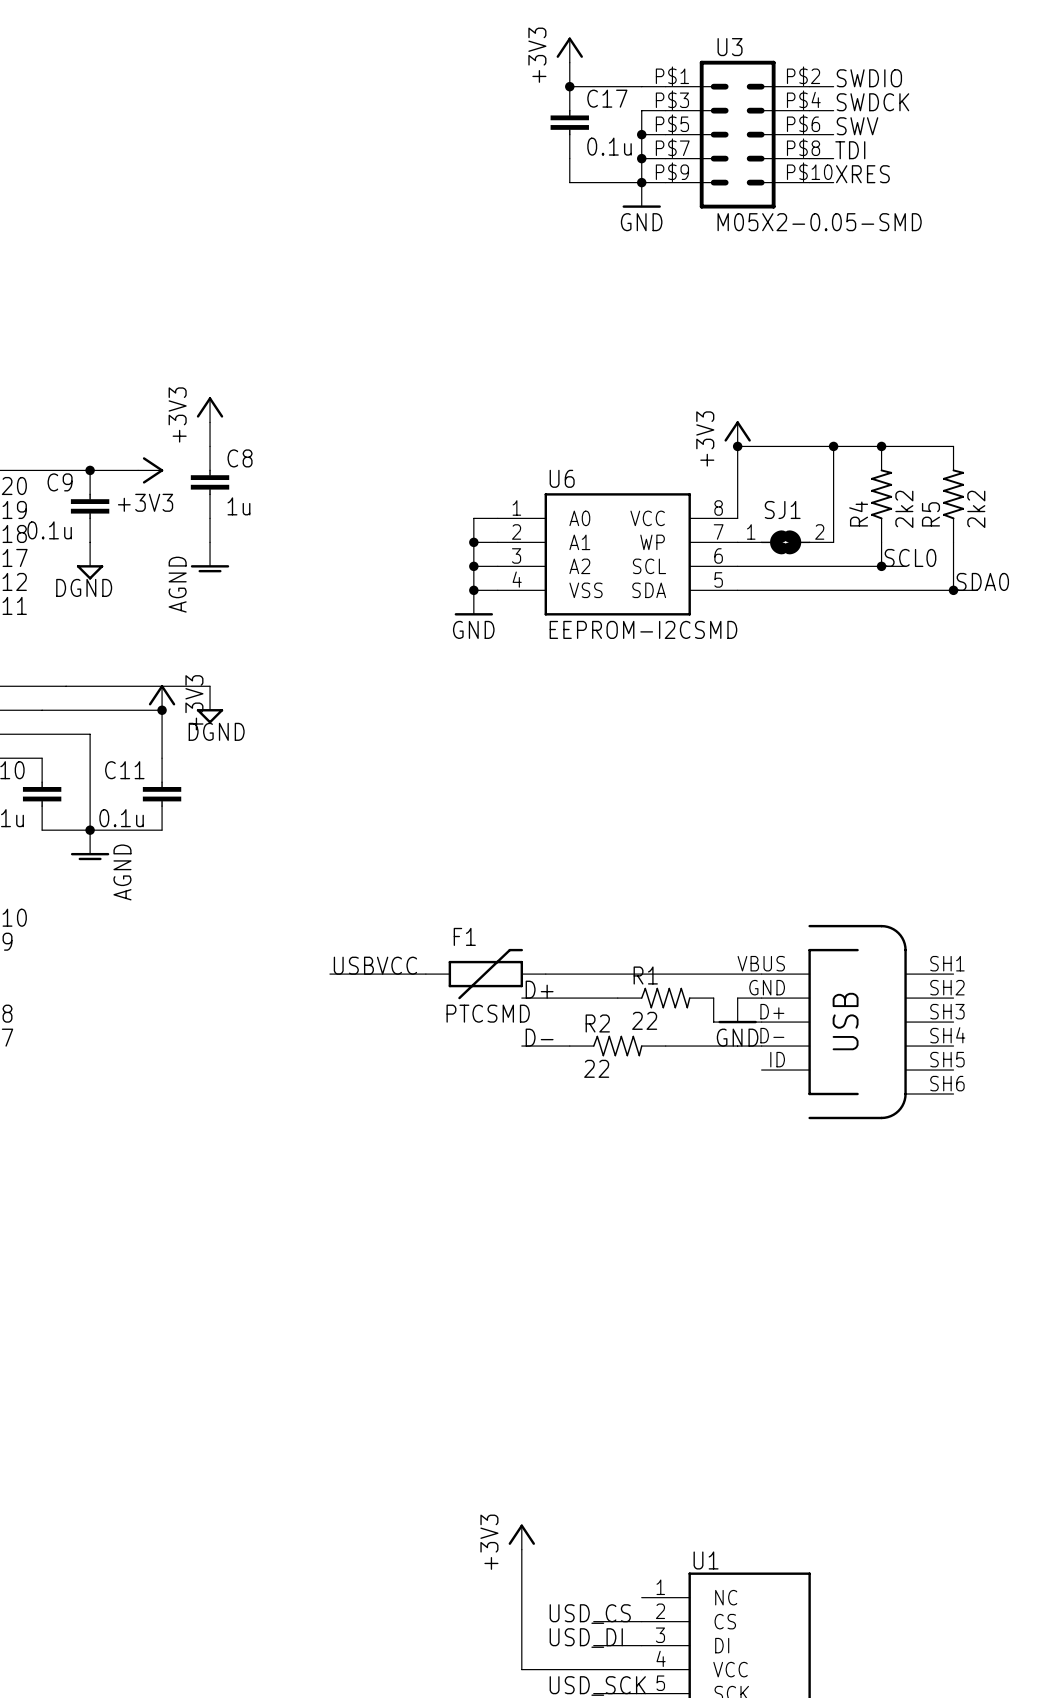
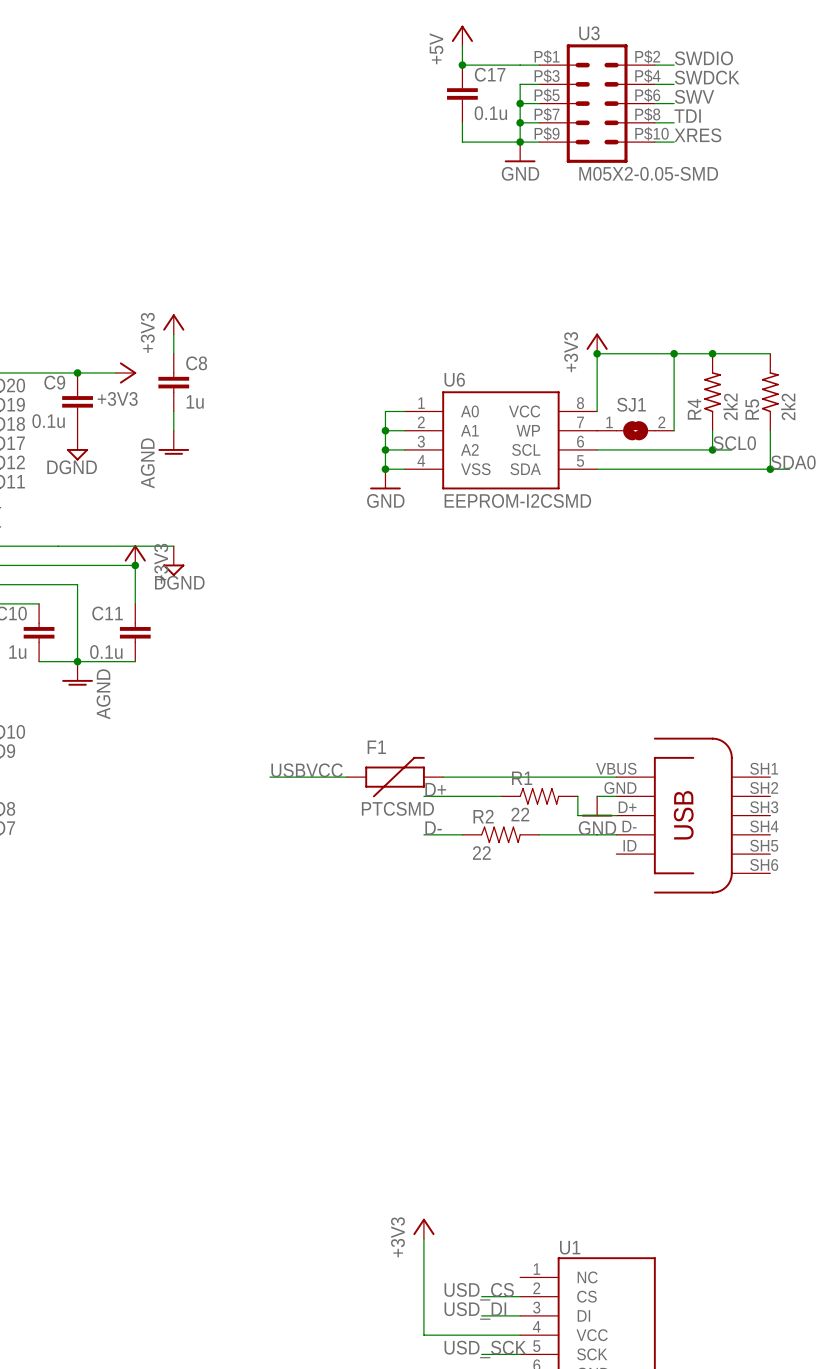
power symbol: +3V3 (569, 50) -> +5V (462, 35)

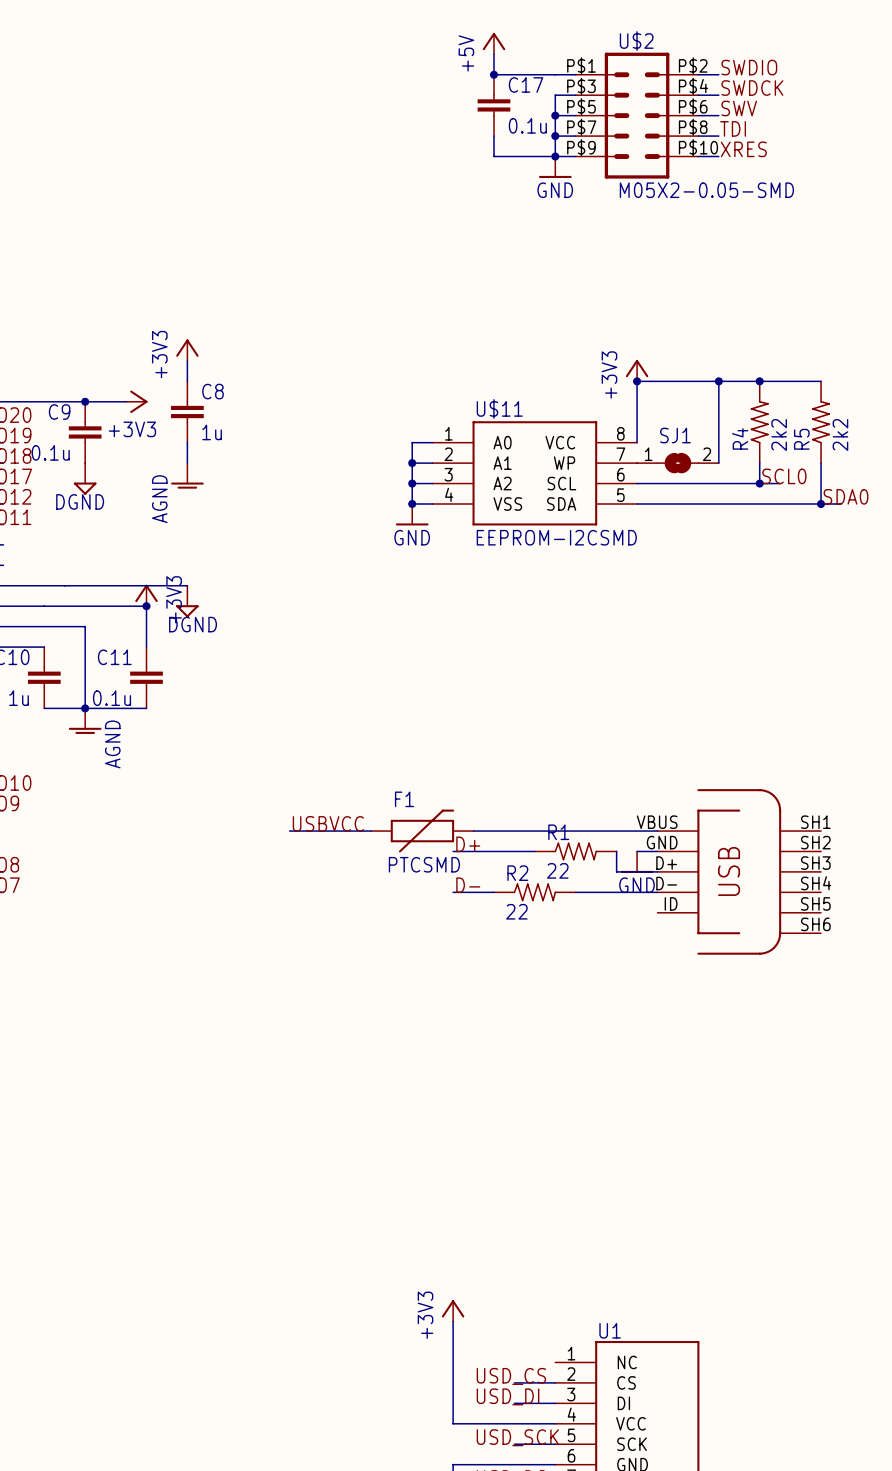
U3 name: U3 (589, 33) -> U$2 (636, 41)
U6 name: U6 (454, 379) -> U$11 (499, 408)

